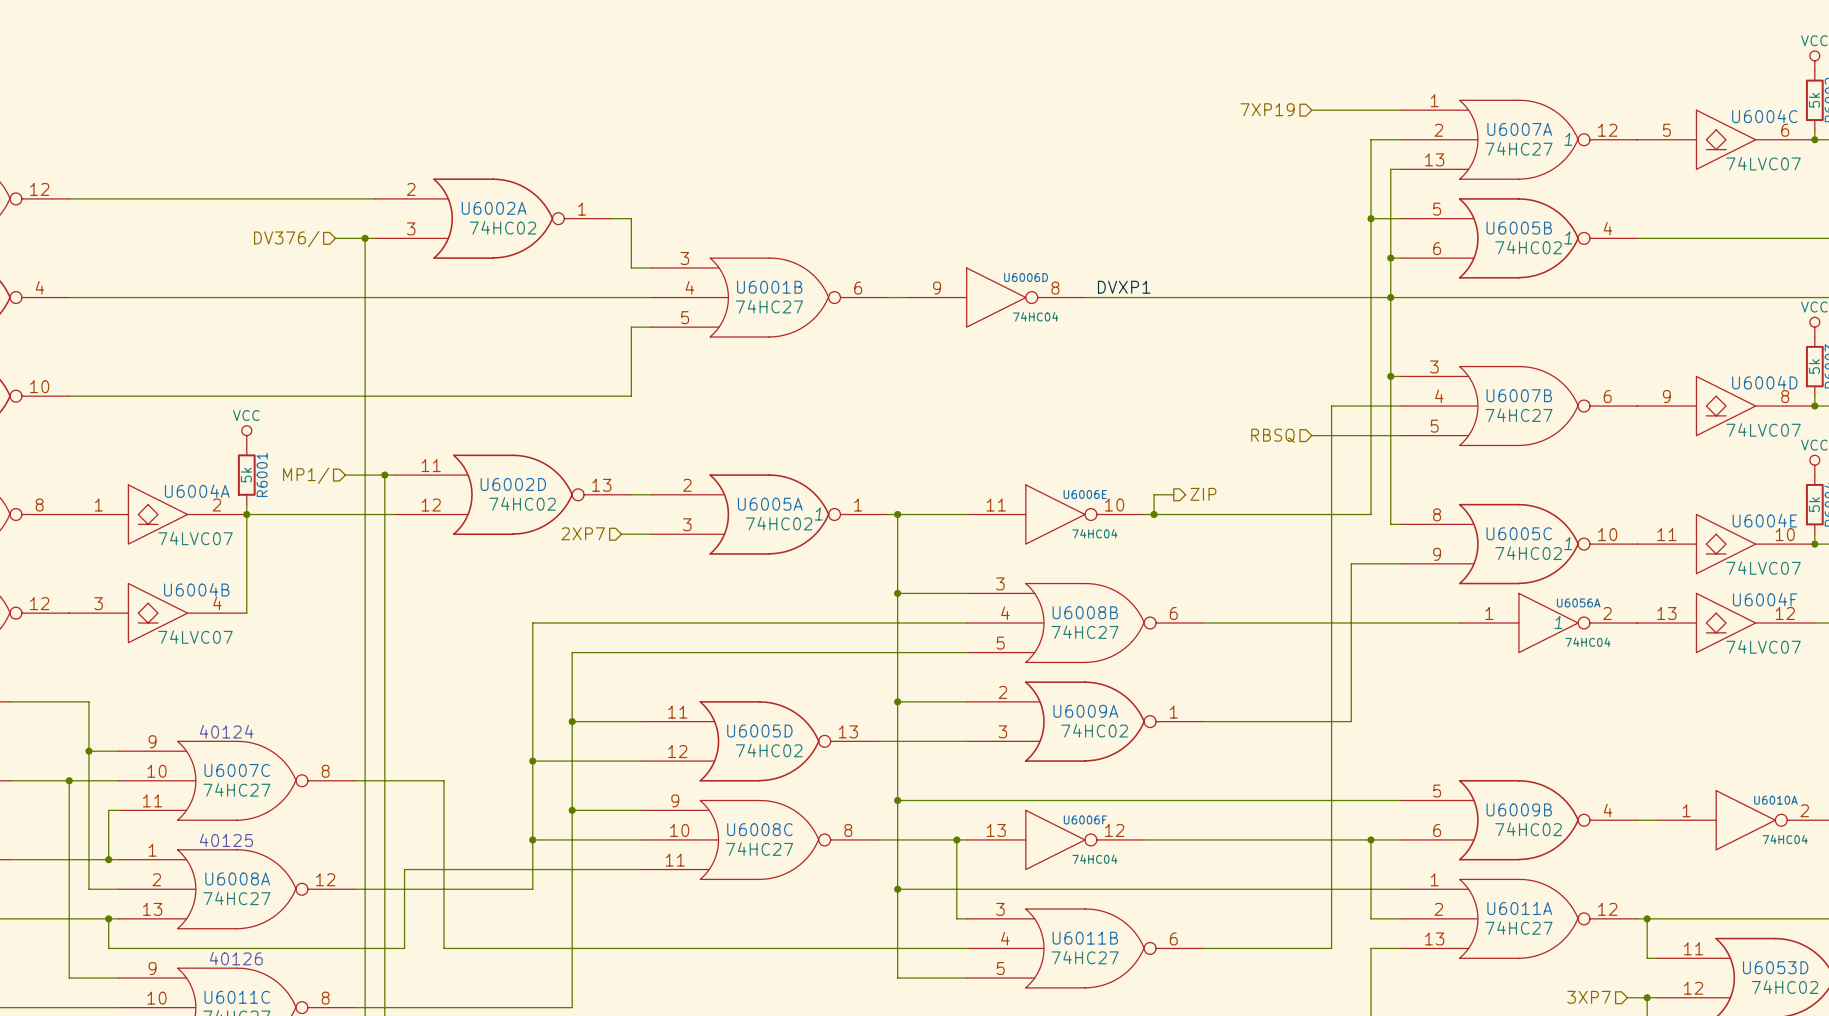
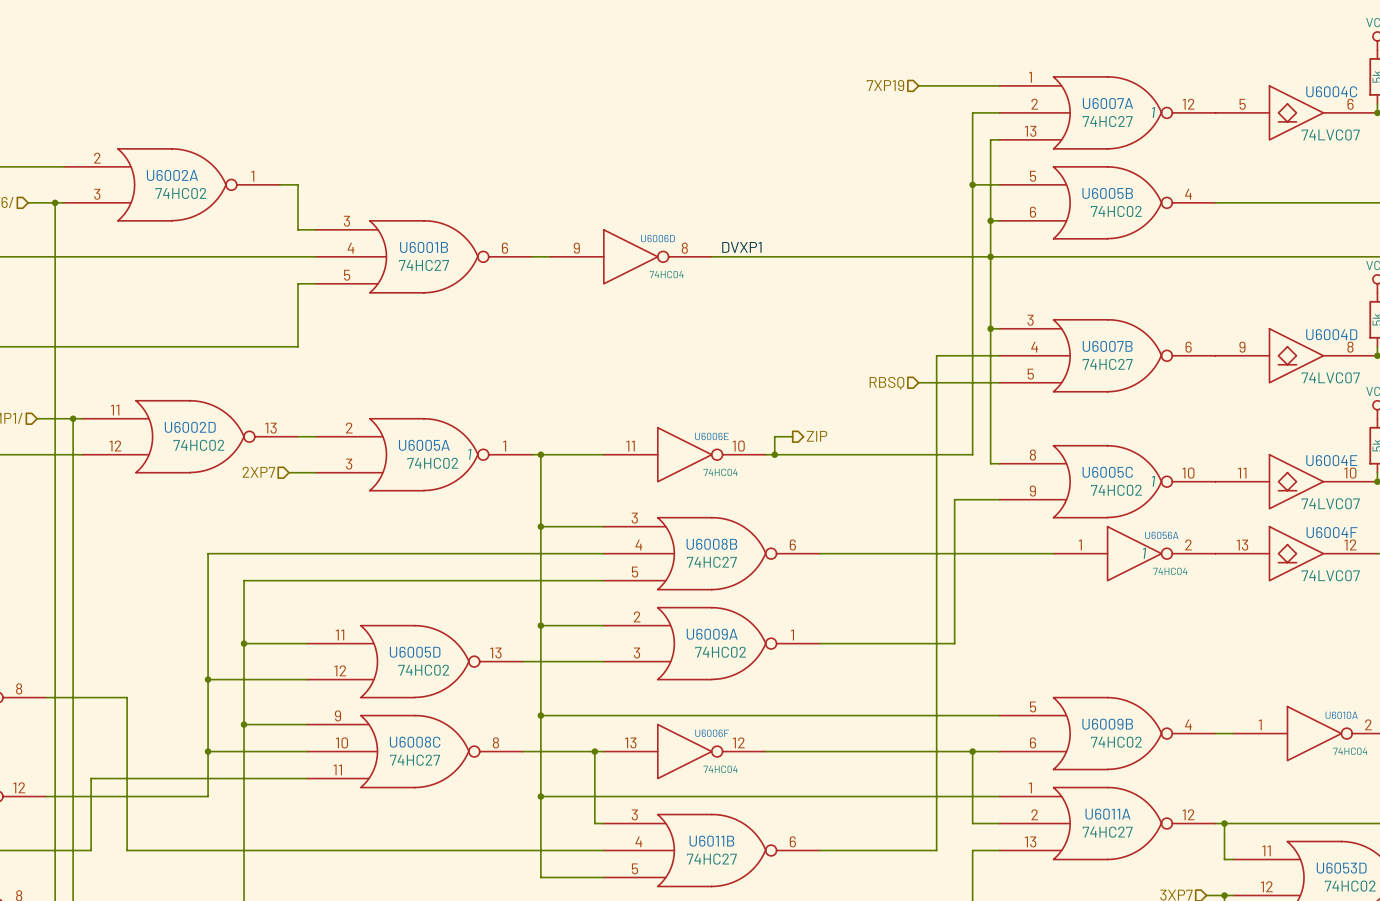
U6005B text: 1 (1568, 237) -> none

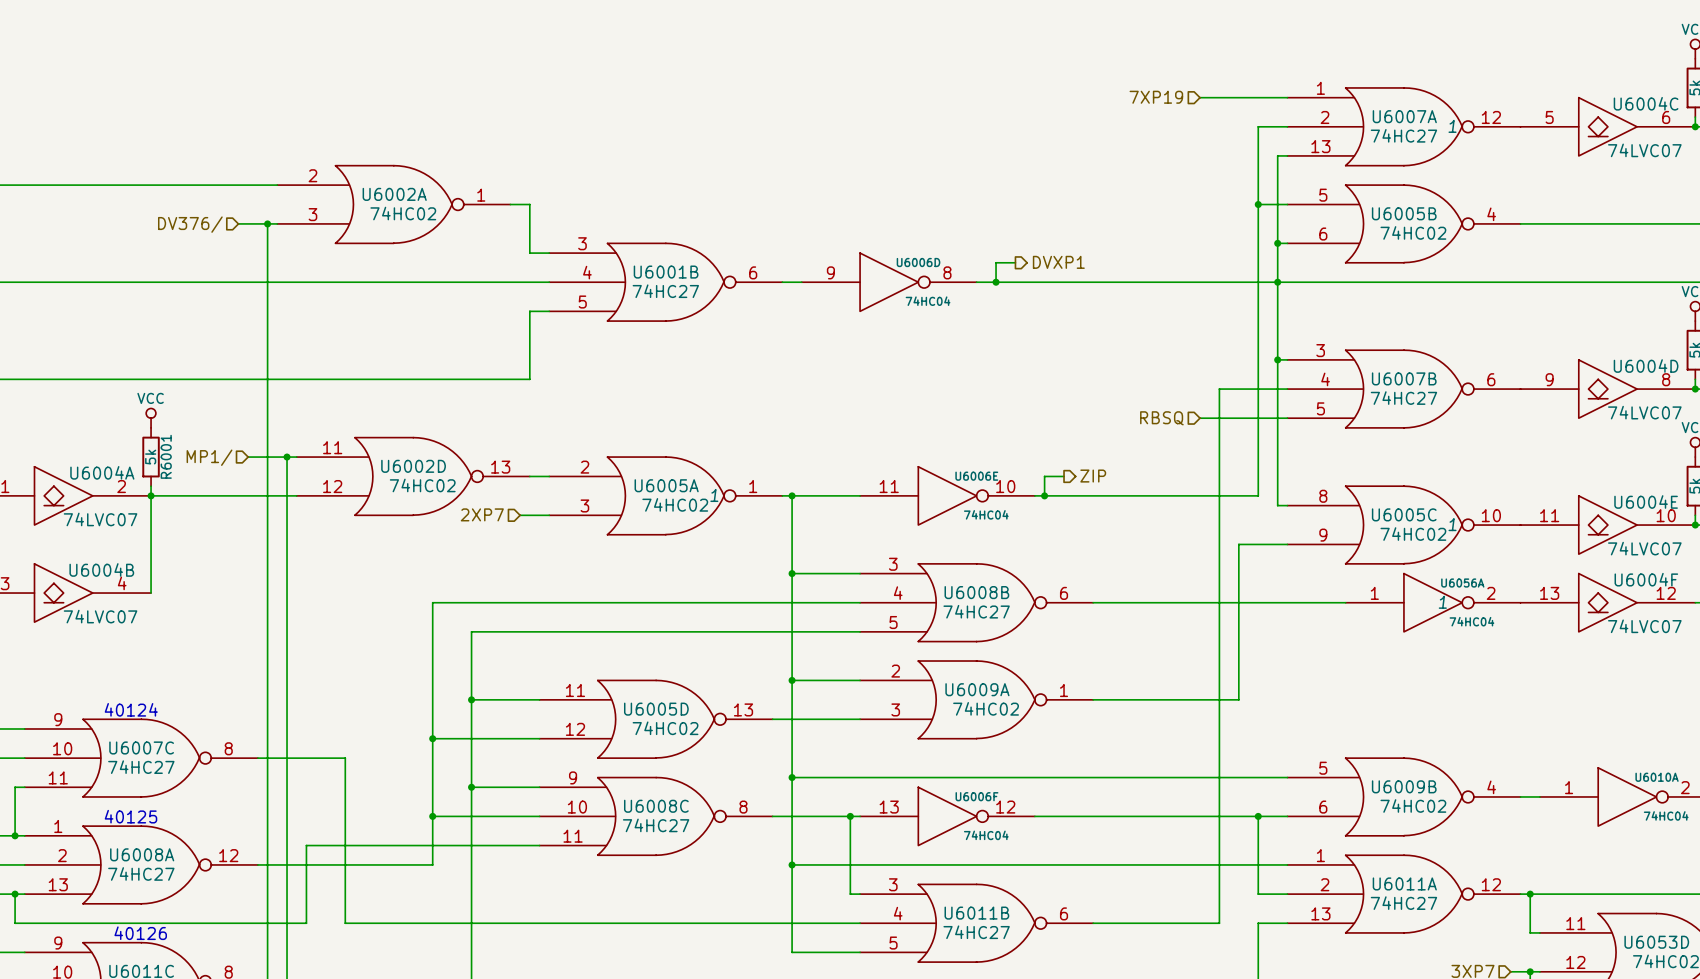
wire: none -> (1015, 262) (996, 262) (996, 282)
hierarchical label: none -> DVXP1 (1058, 262)
label: DVXP1 (741, 247) -> none
junction: none -> (996, 282)

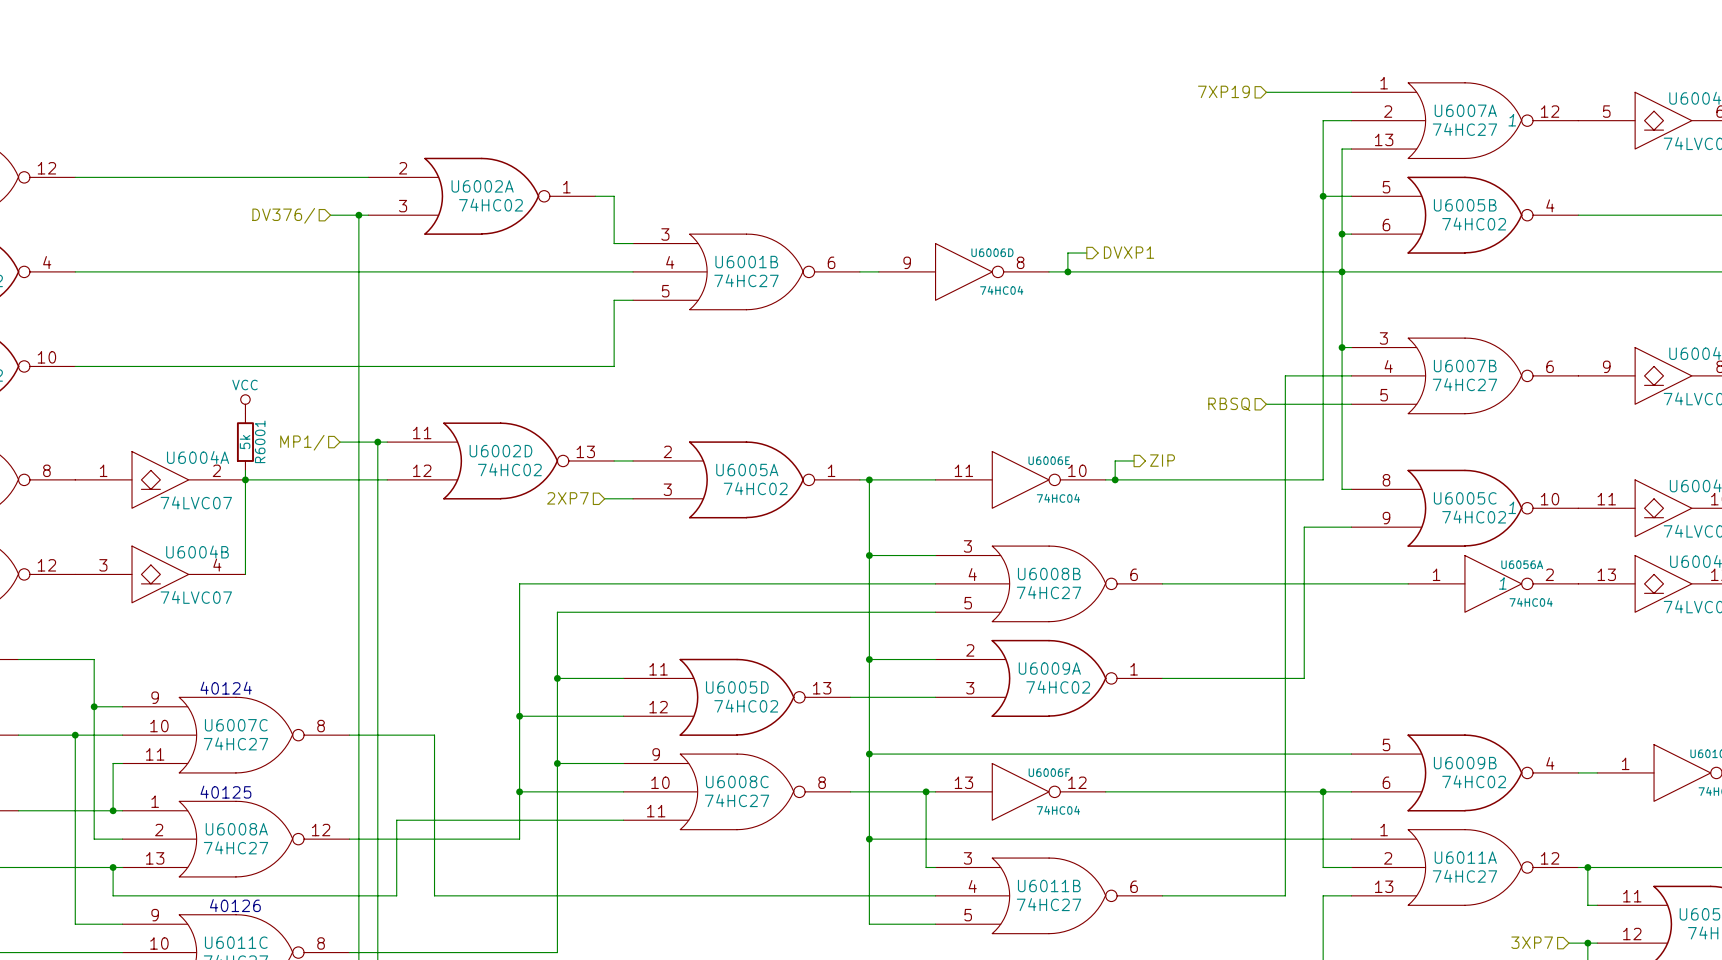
U6005A text: 1 (714, 495) -> none

